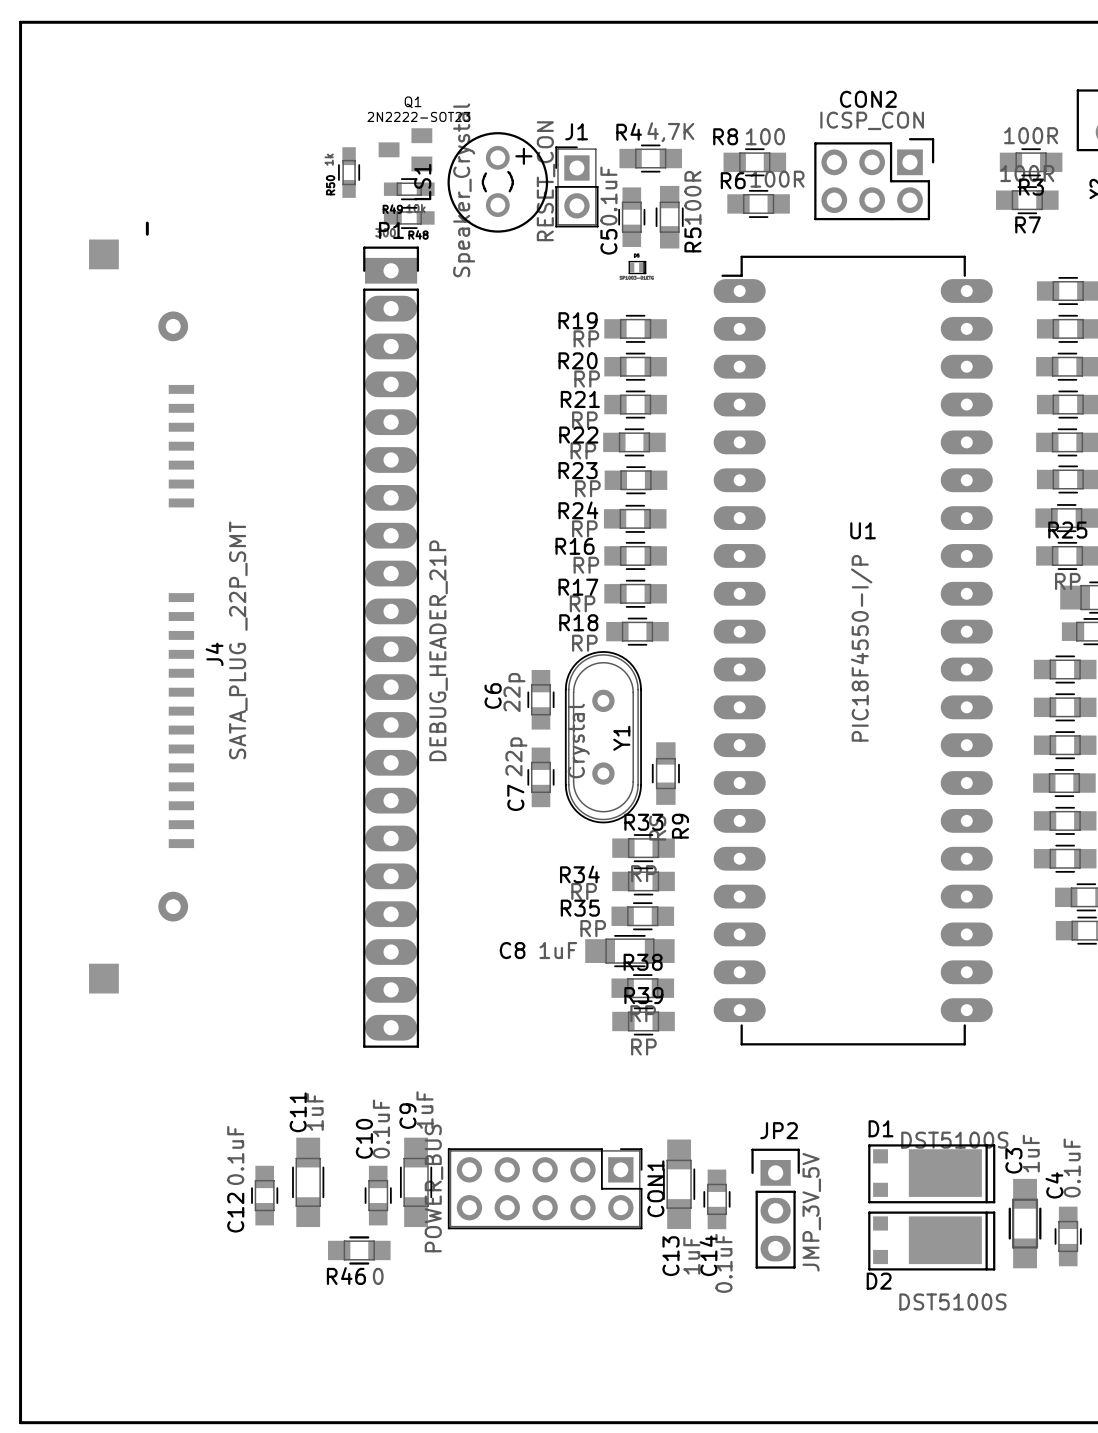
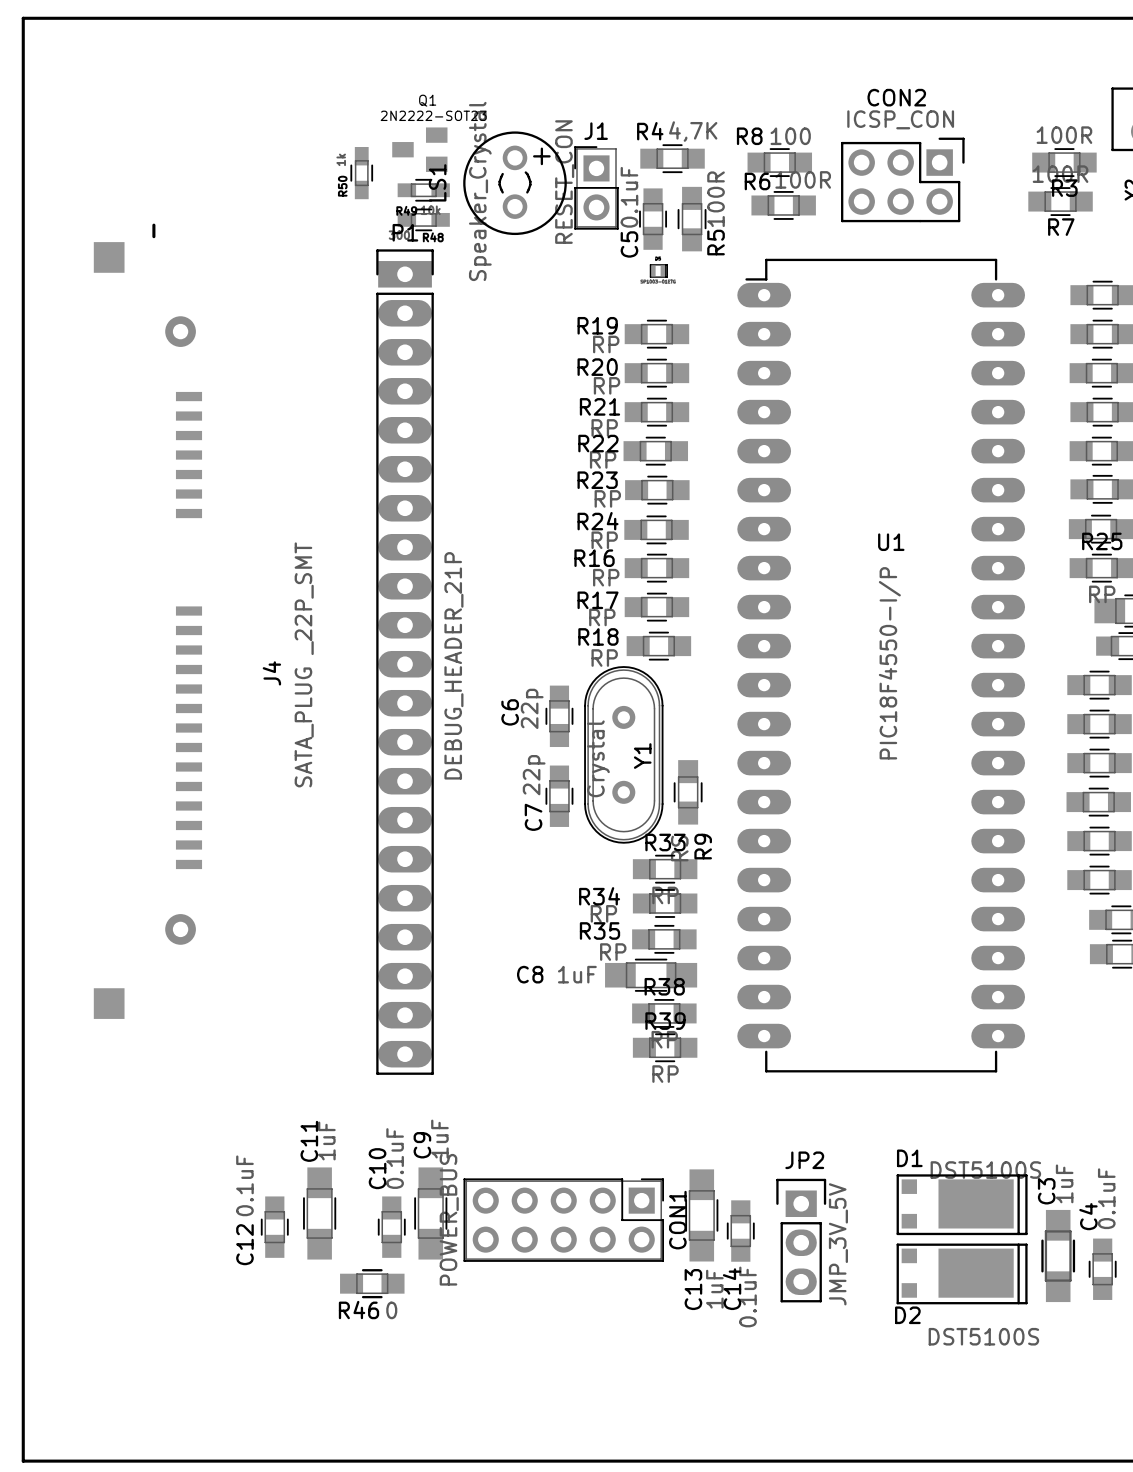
J4 value position: SATA_PLUG _22P_SMT (238, 640) -> SATA_PLUG _22P_SMT (304, 664)
J4 name position: J4 (214, 654) -> J4 (271, 673)

